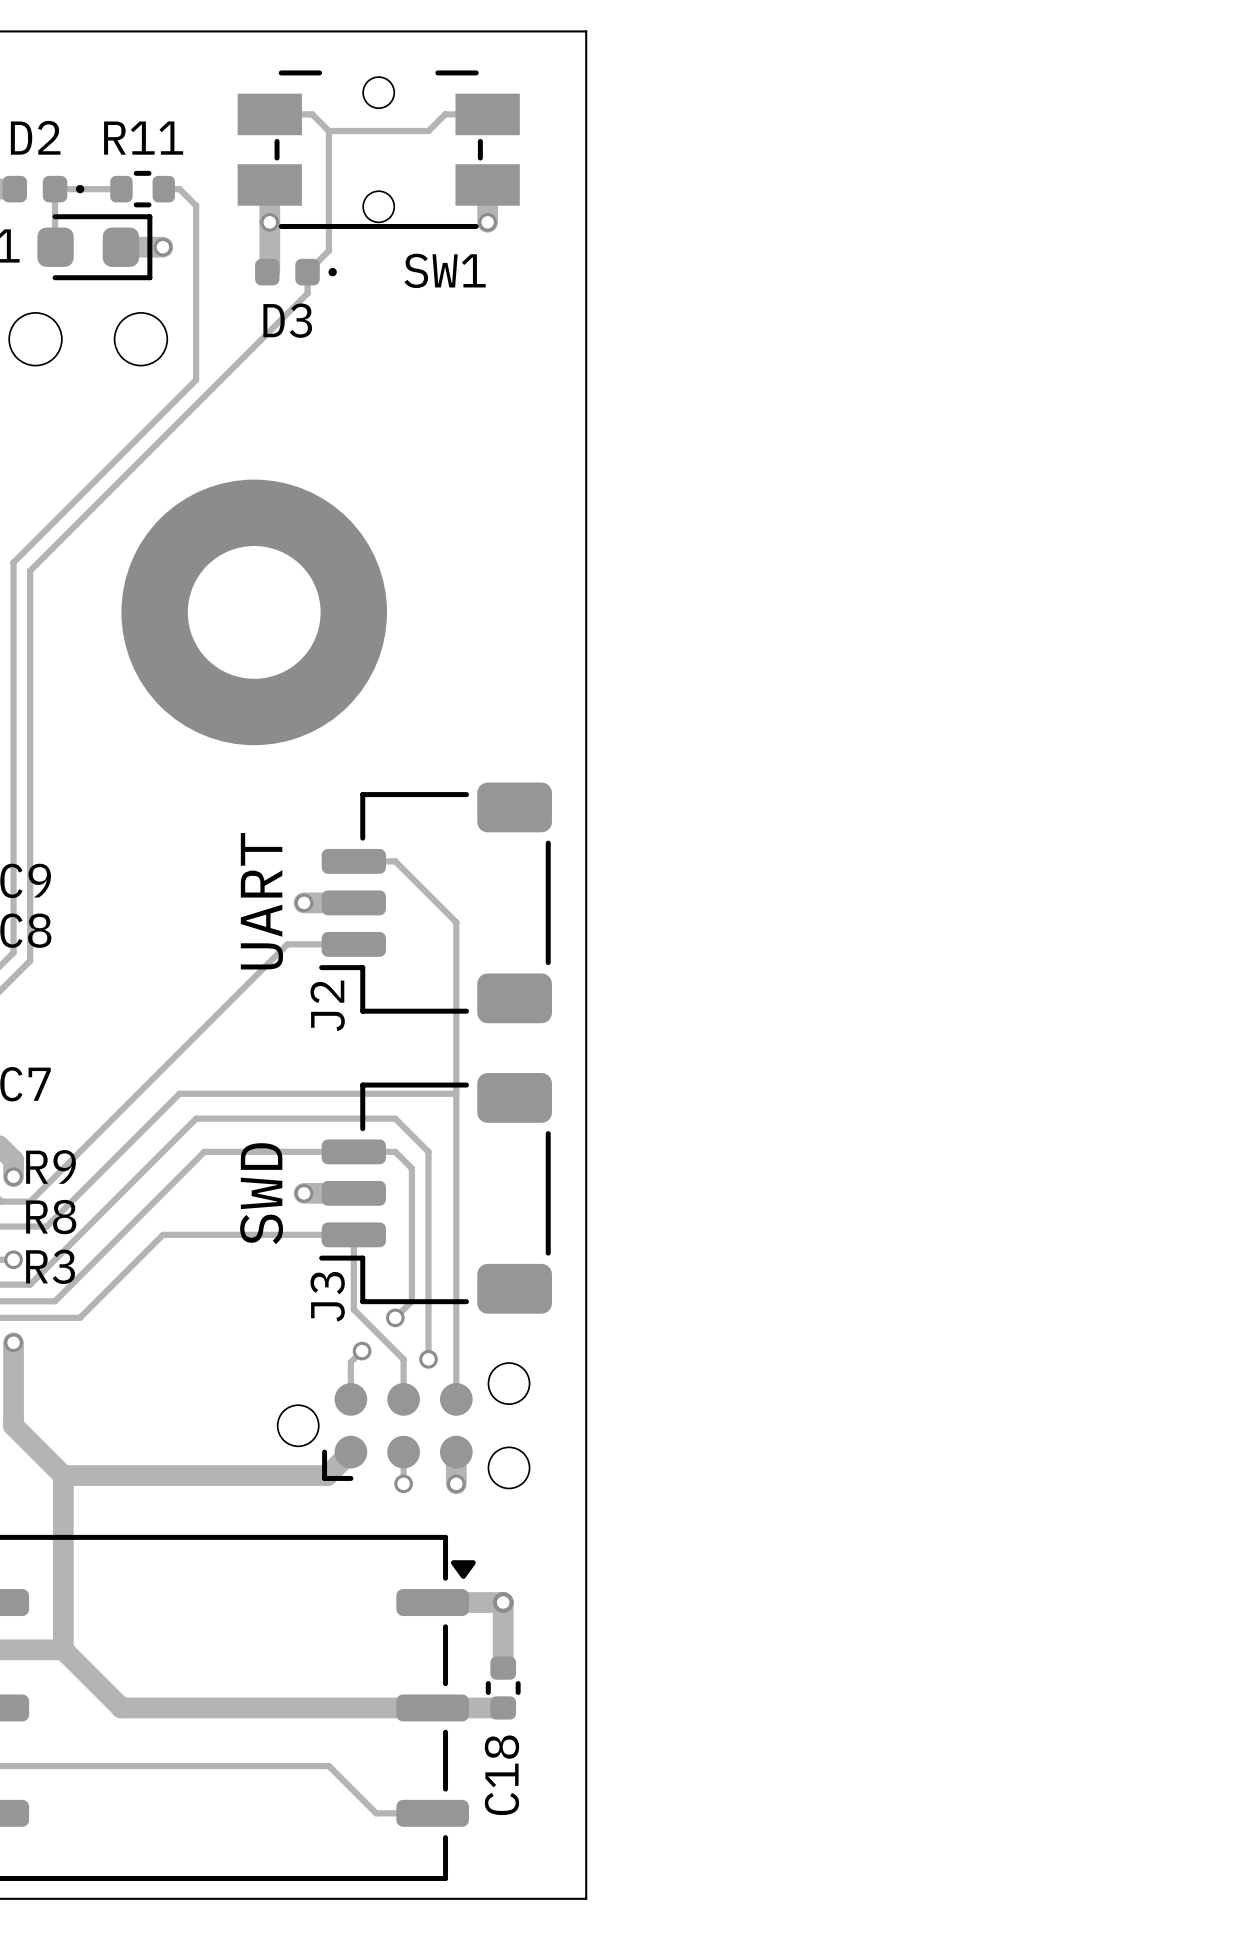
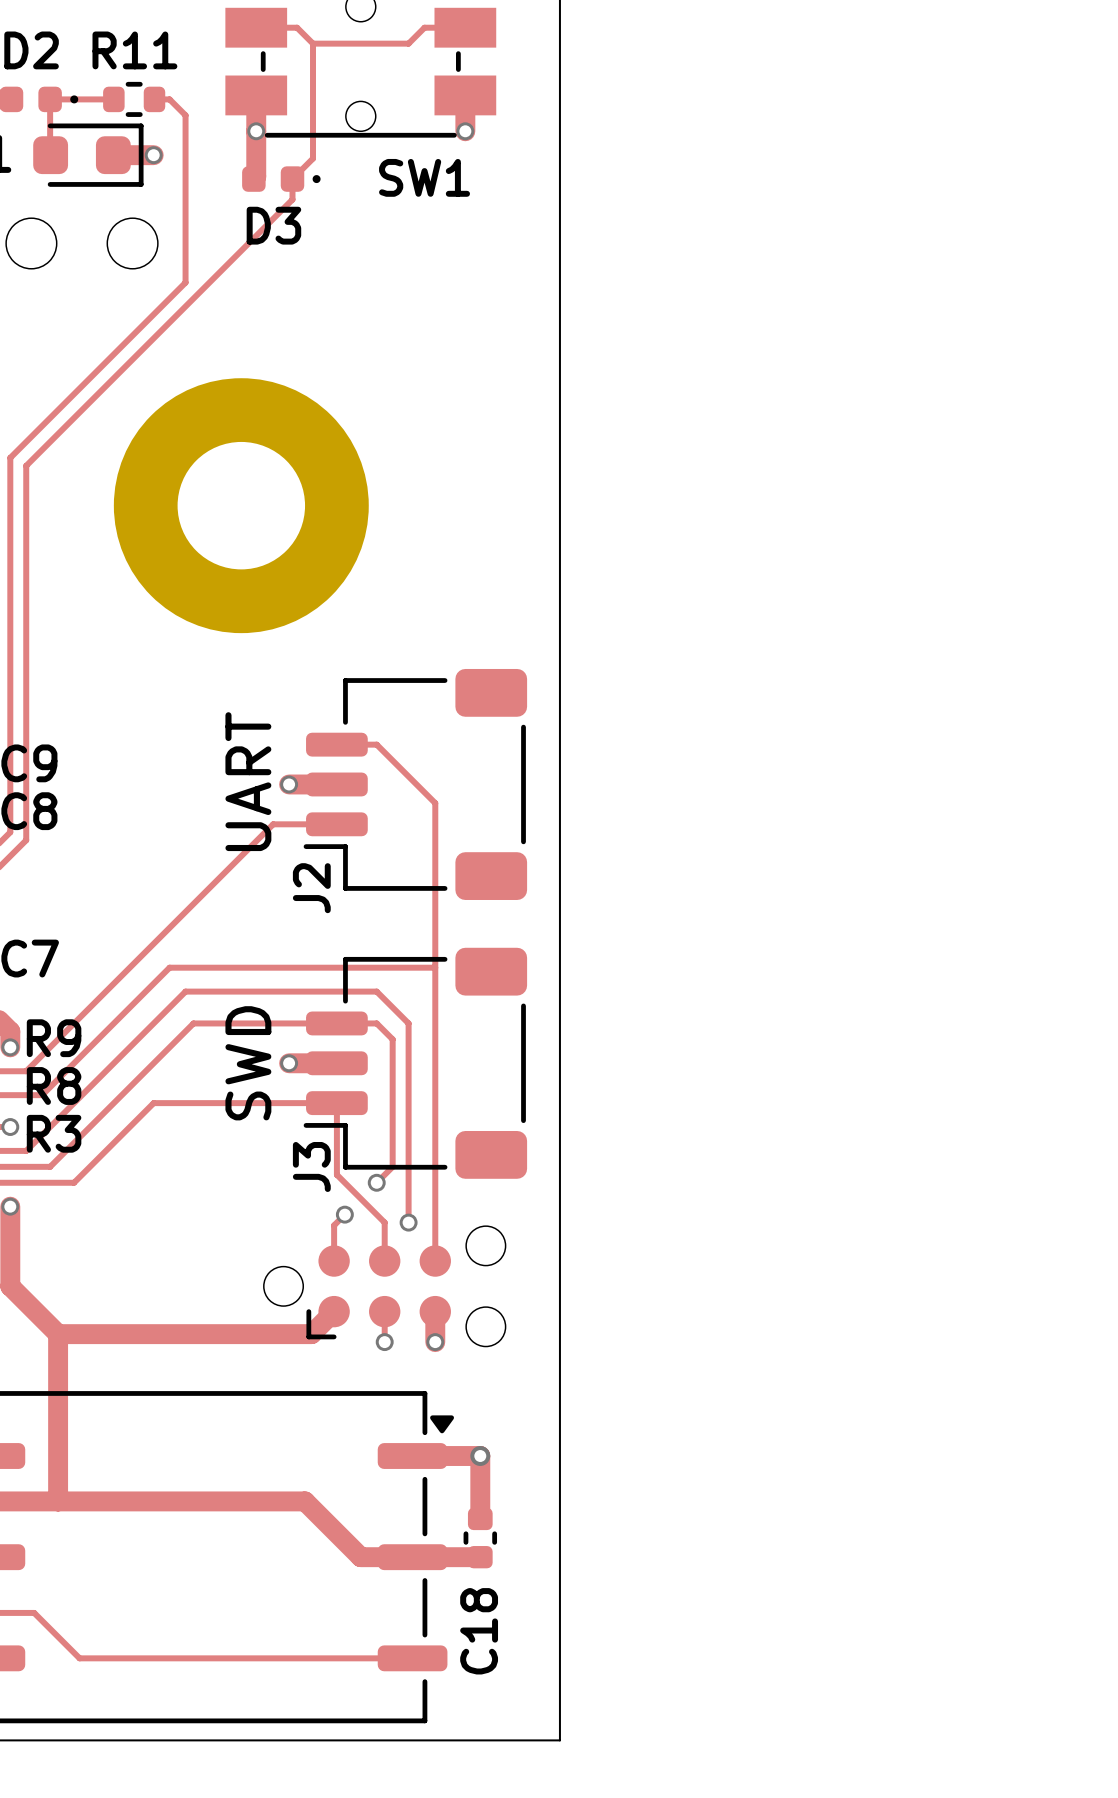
track: (63, 1649) (121, 1707) (378, 1707) -> (58, 1501) (305, 1501) (360, 1557)
track: (38, 1766) (328, 1766) (376, 1813) -> (34, 1612) (79, 1658) (358, 1658)

